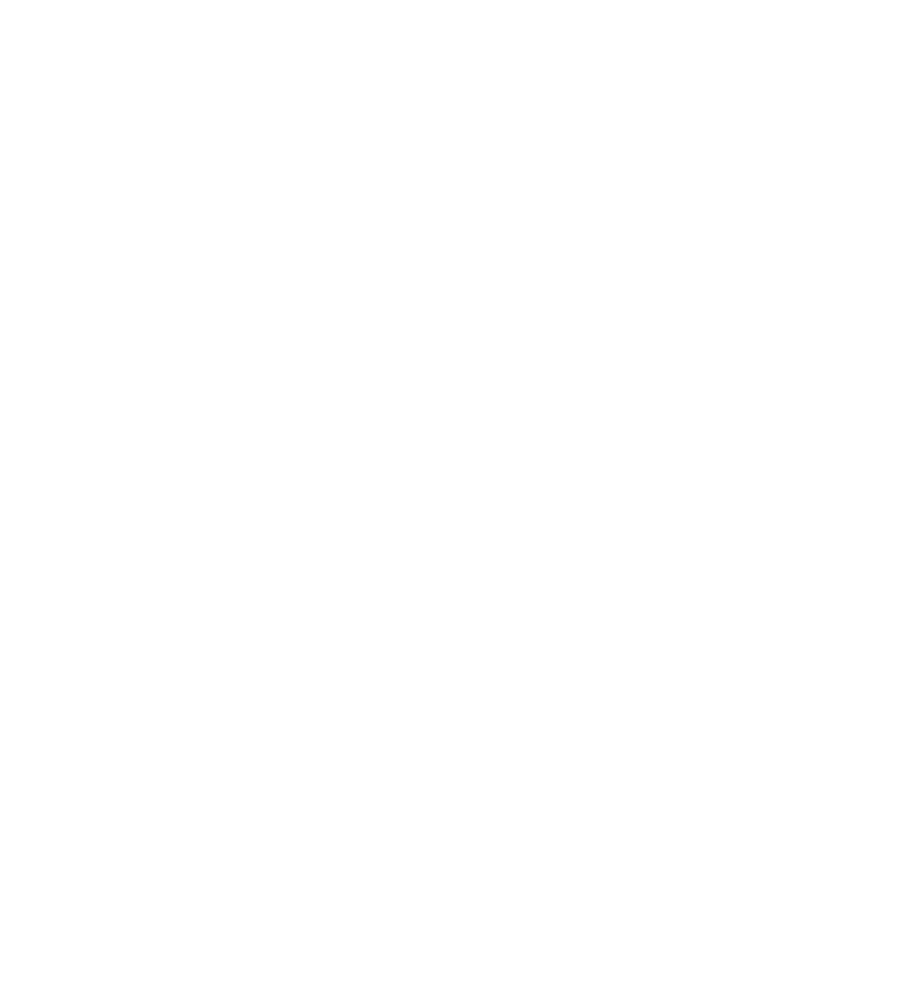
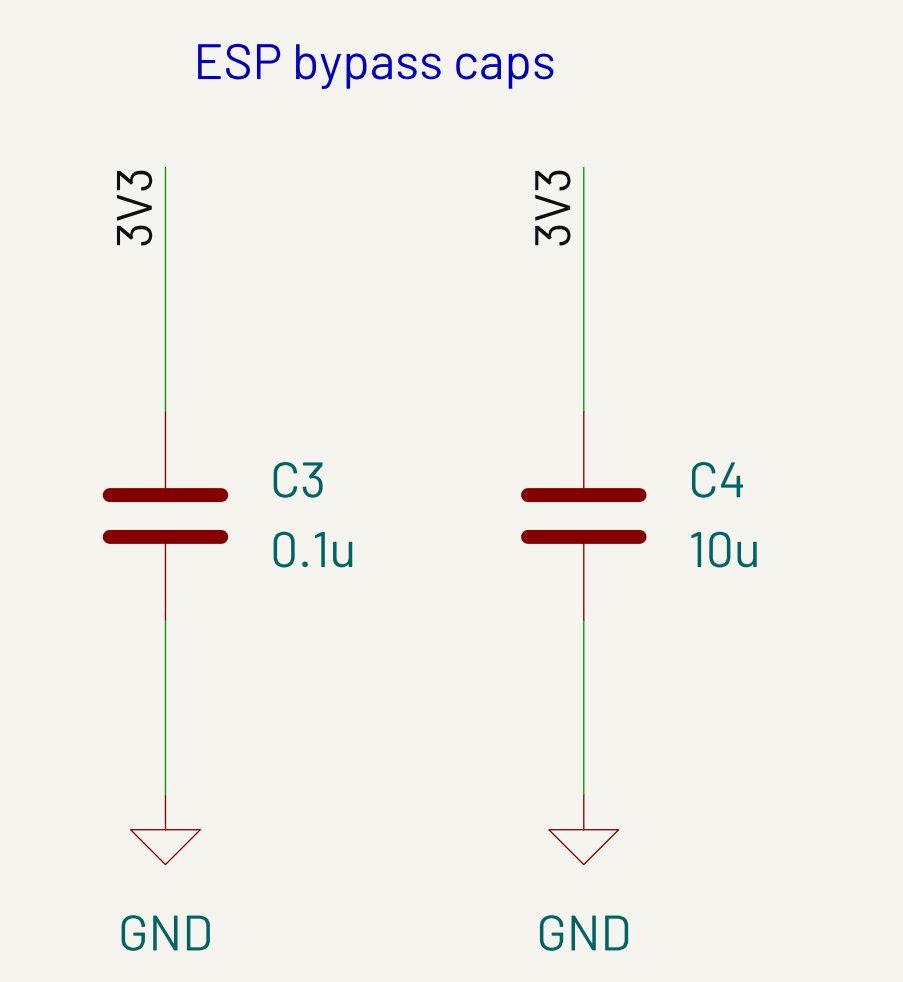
text: none -> ESP bypass caps (375, 66)
wire: none -> (165, 167) (165, 411)
wire: none -> (583, 167) (583, 411)
label: none -> 3V3 (134, 208)
label: none -> 3V3 (552, 208)
C3: none -> 0.1u (165, 516)
C4: none -> 10u (583, 516)
wire: none -> (165, 620) (165, 794)
wire: none -> (583, 620) (583, 794)
power symbol: none -> GND (165, 829)
power symbol: none -> GND (583, 829)

